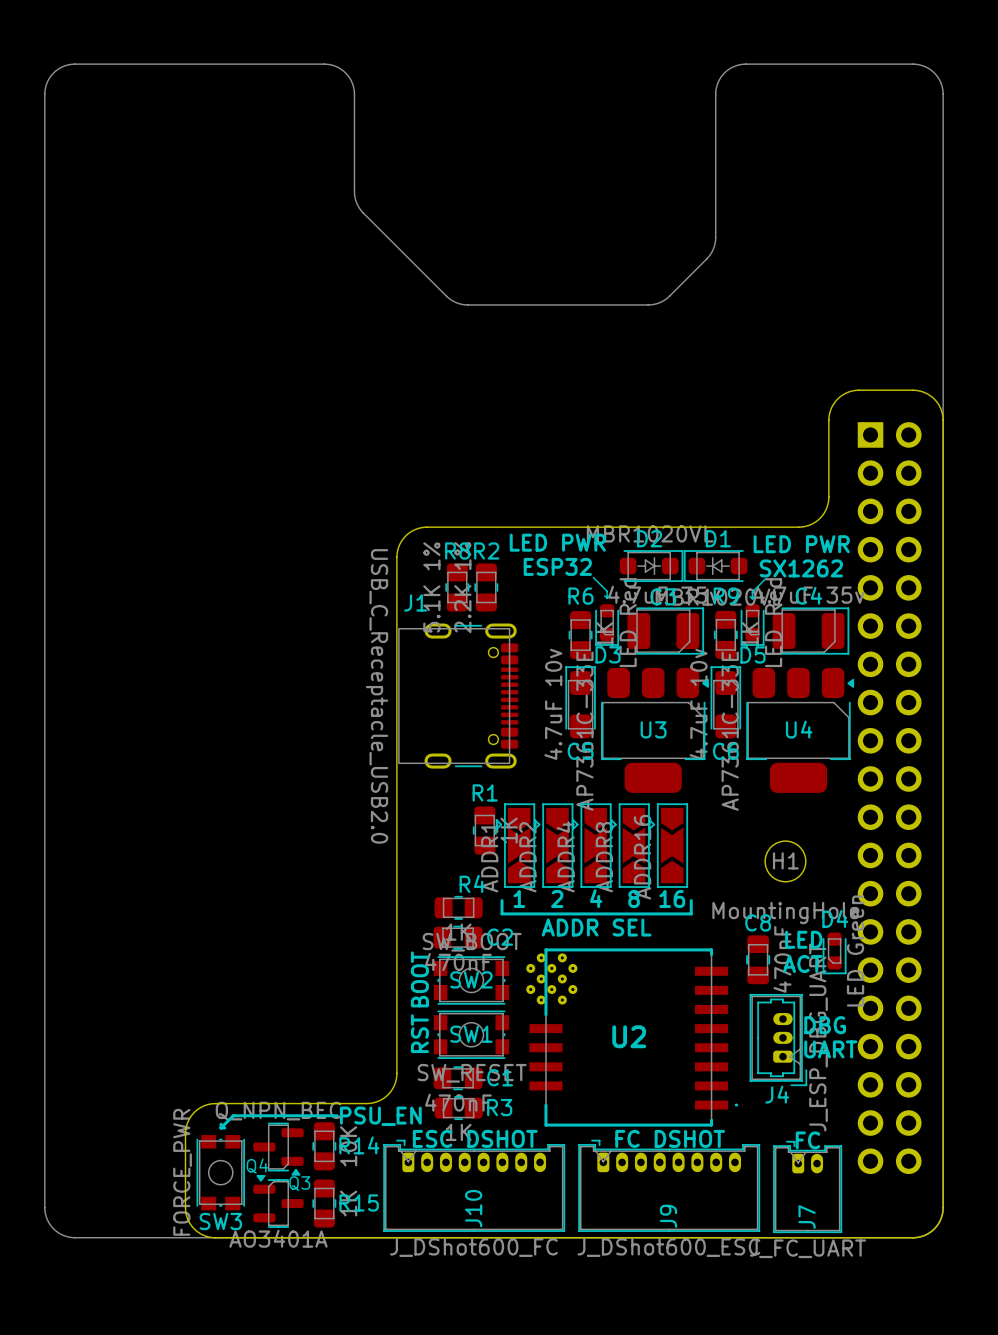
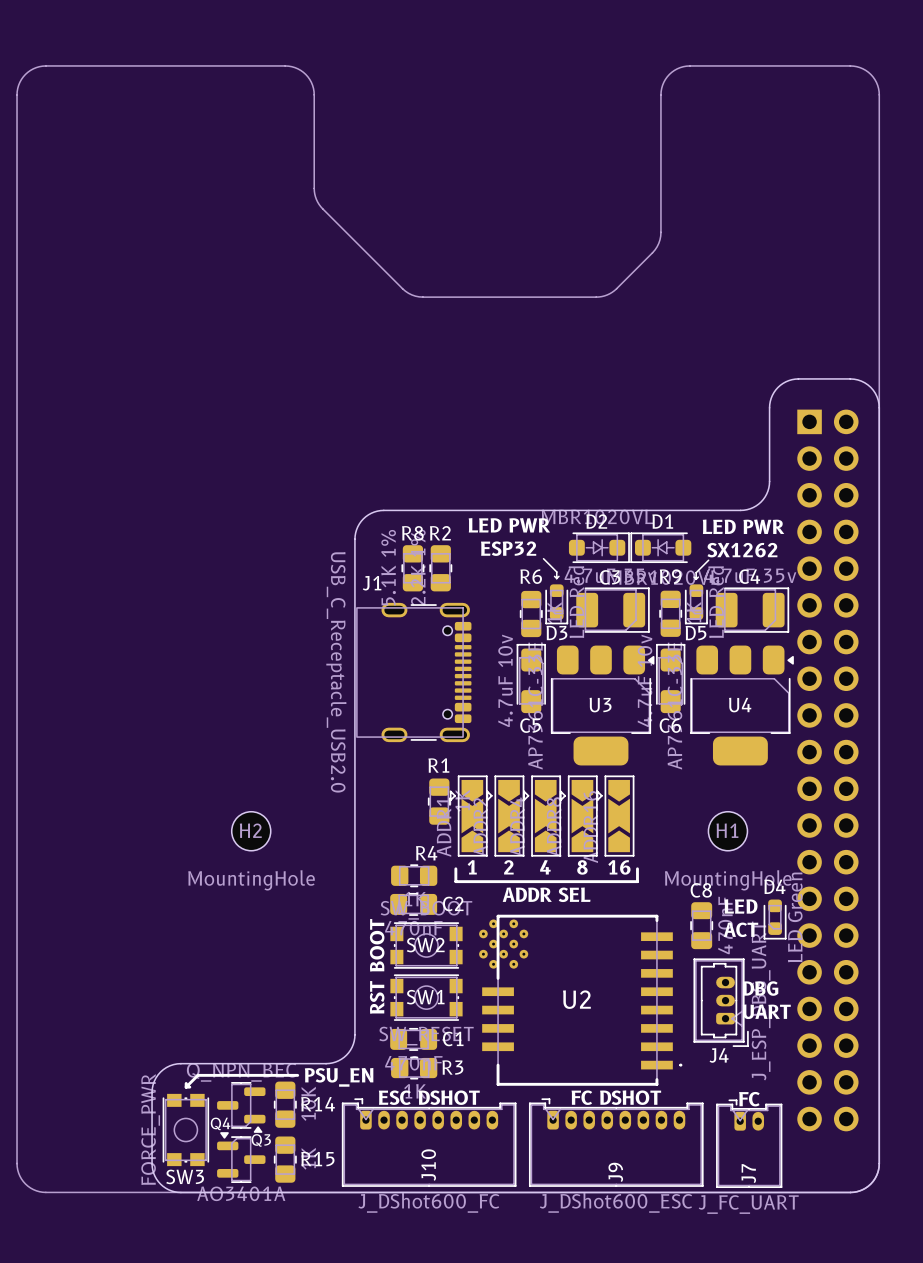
H2: none -> MountingHole (251, 831)

